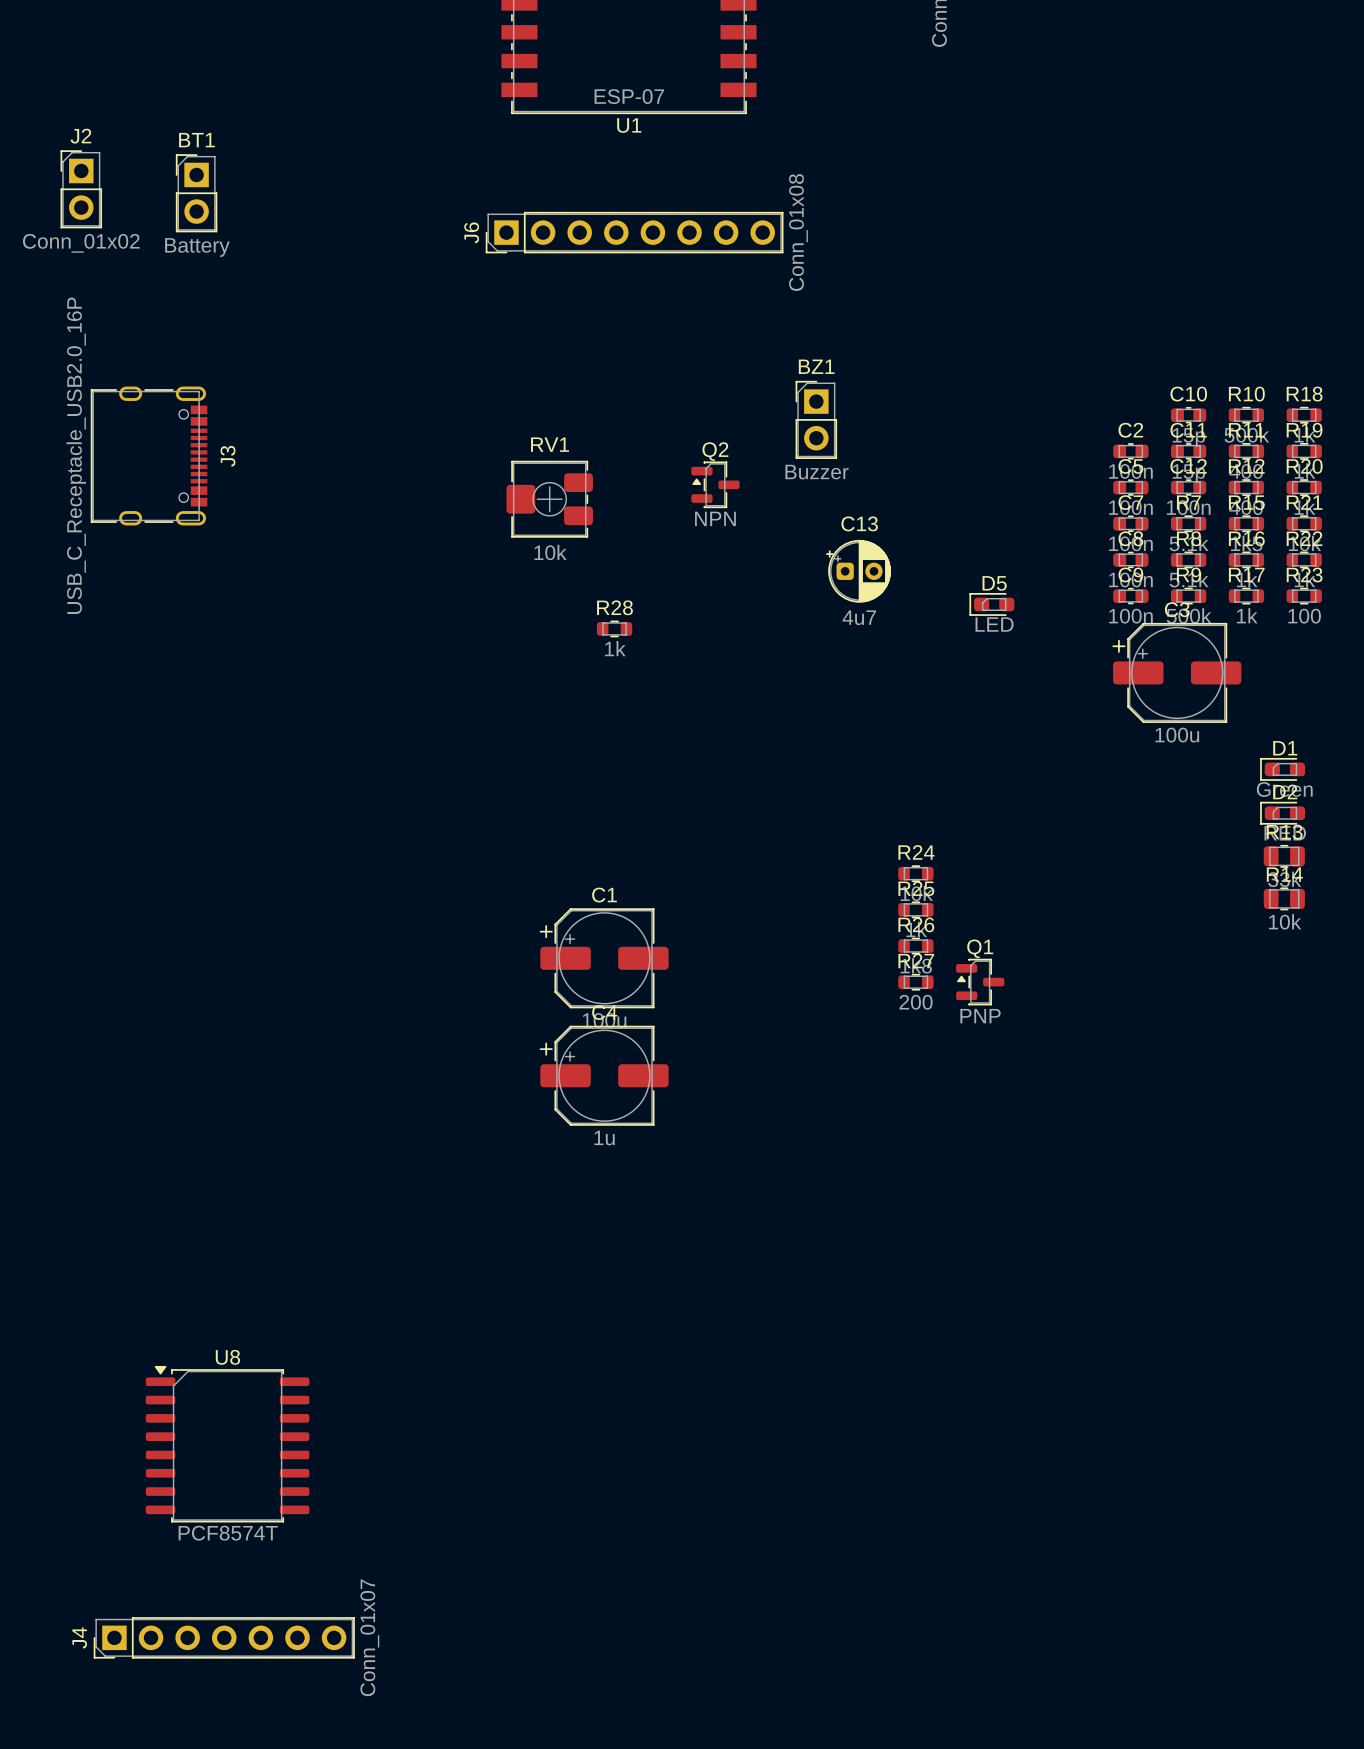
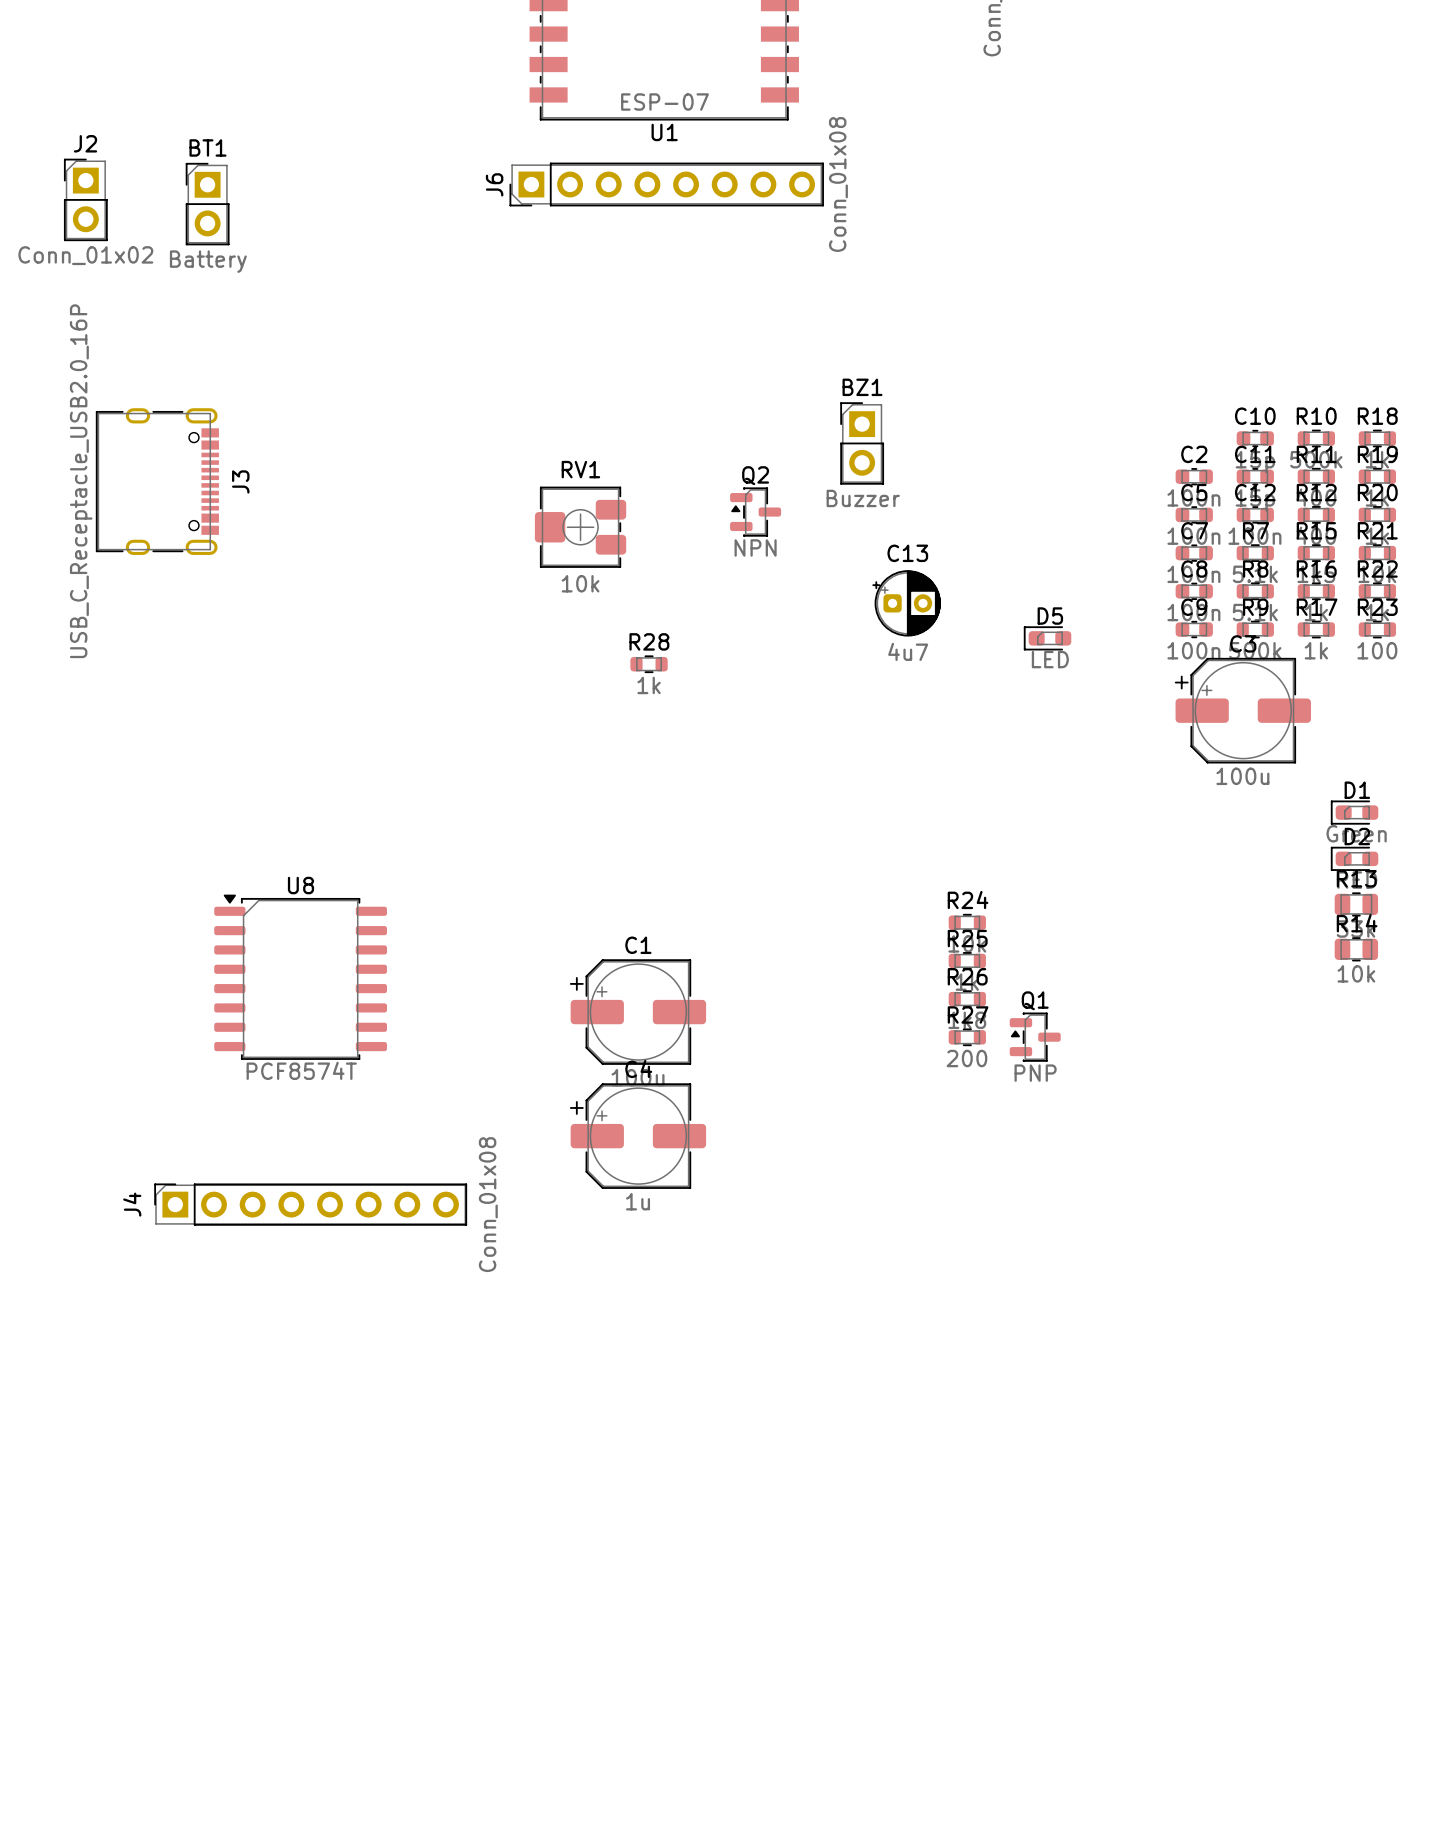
J6 position: (634, 232) -> (666, 184)
U8 position: (227, 1444) -> (300, 977)
J4 footprint: [93, 1617, 355, 1659] -> [154, 1183, 468, 1226]
J4 value: Conn_01x07 (369, 1637) -> Conn_01x08 (488, 1204)

